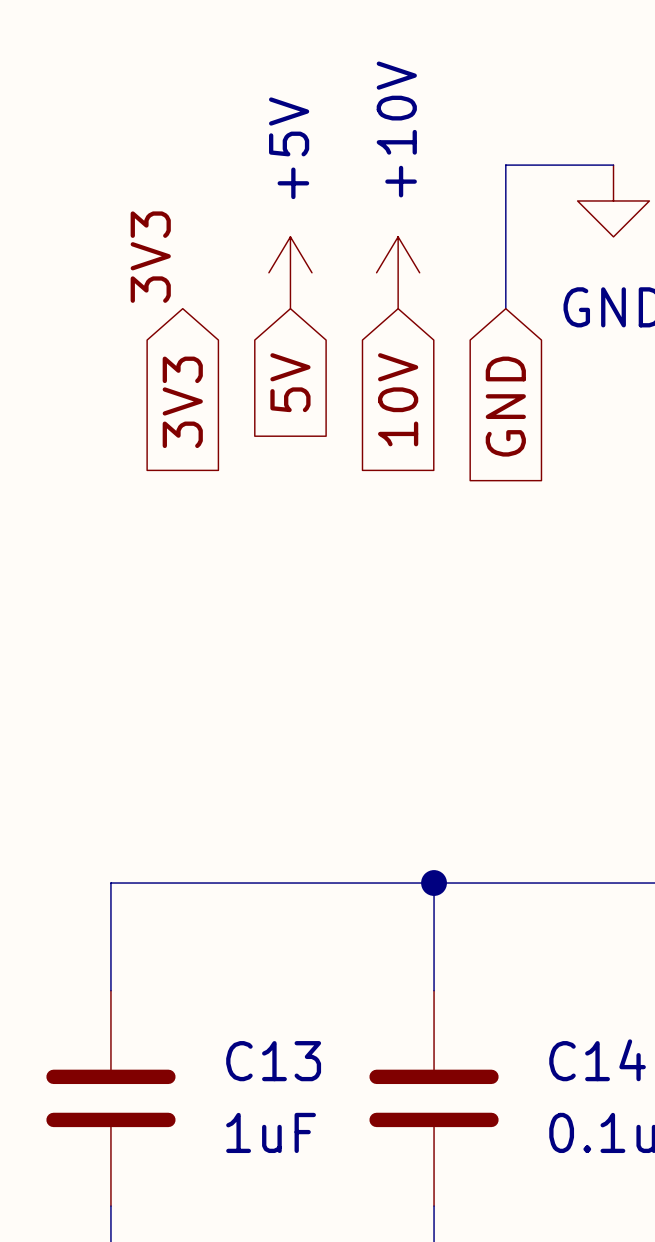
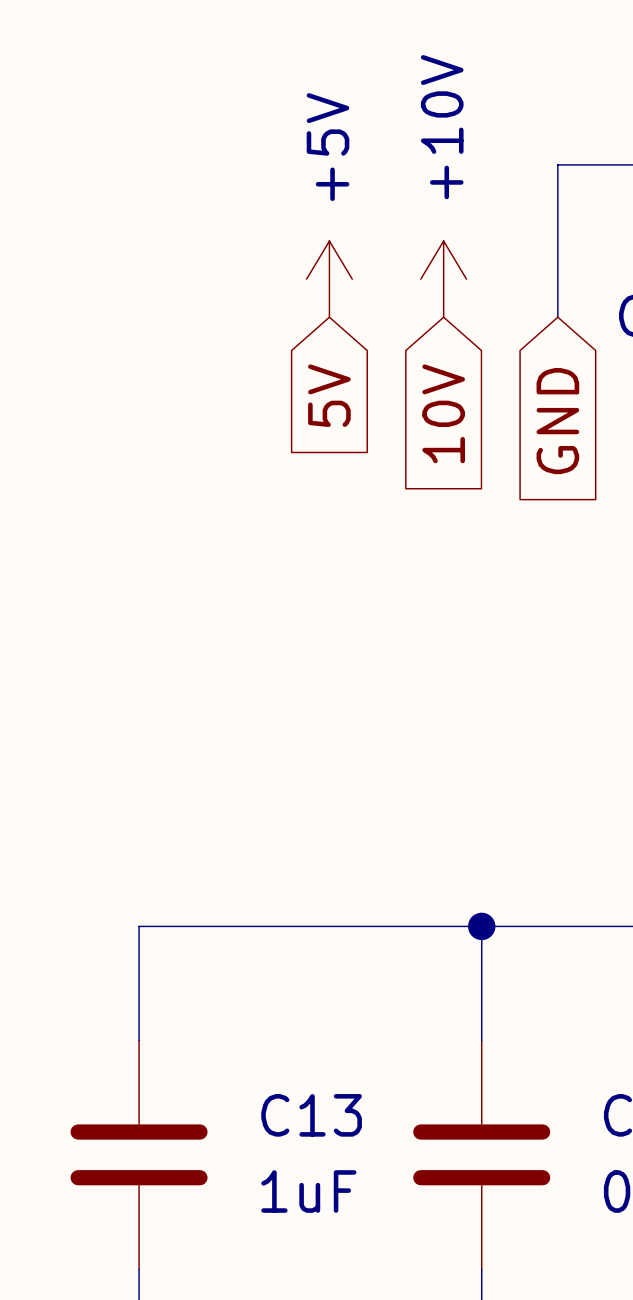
label: 3V3 (150, 257) -> none
global label: 3V3 (182, 402) -> none

